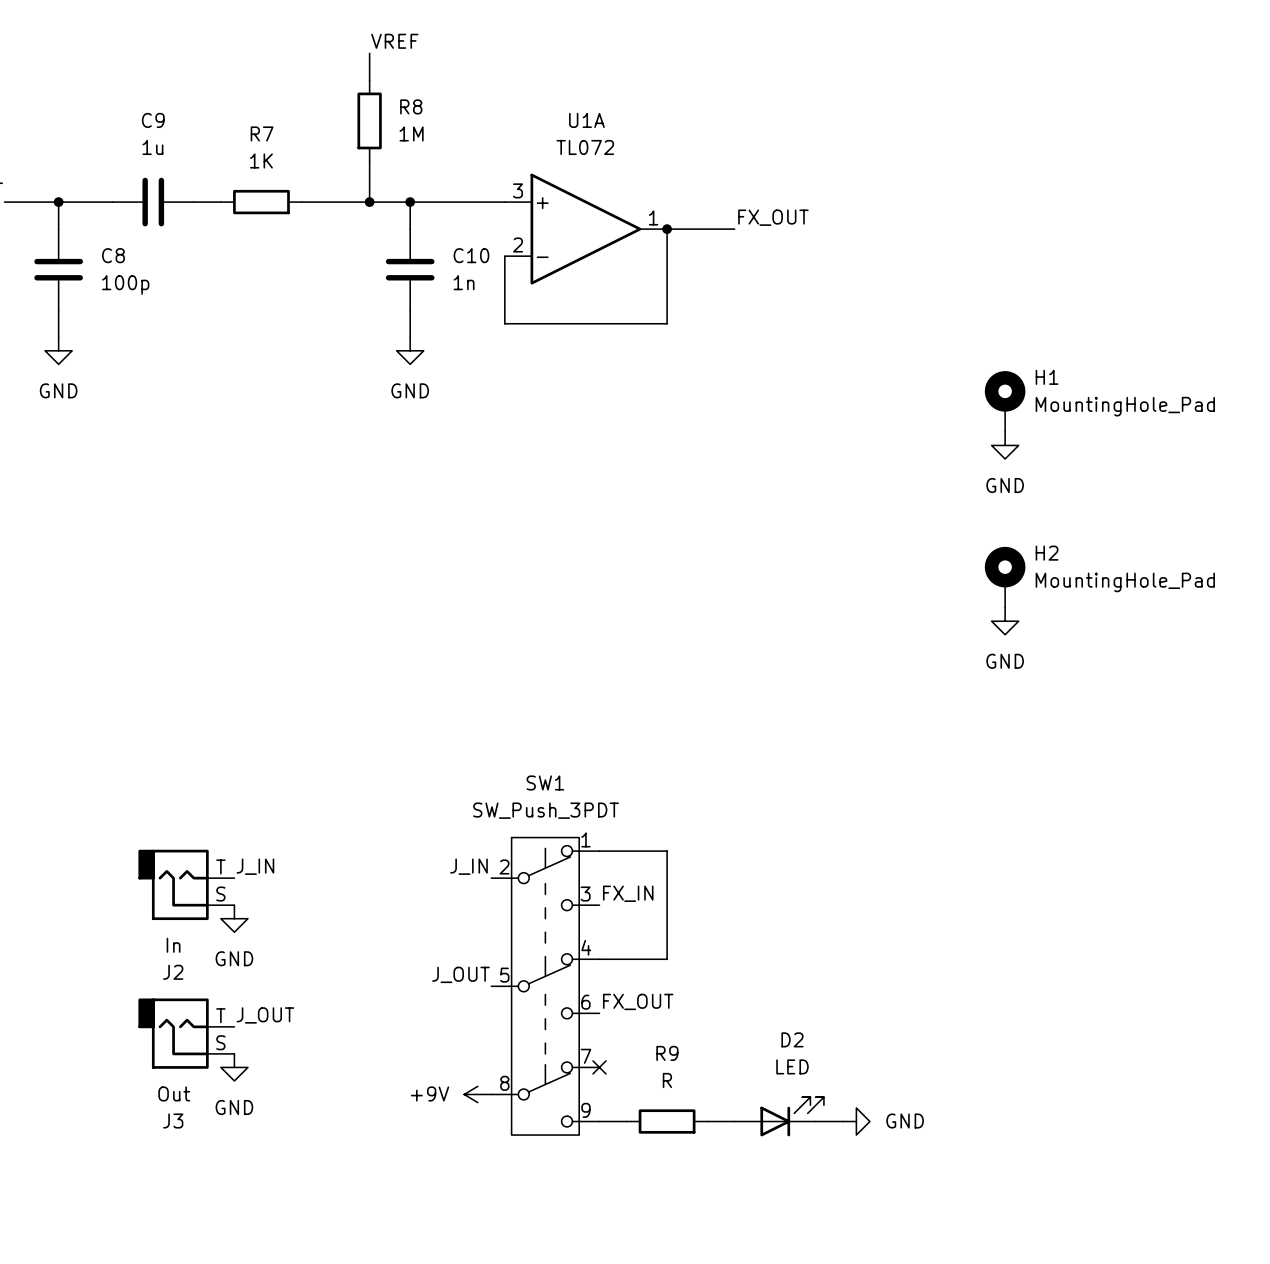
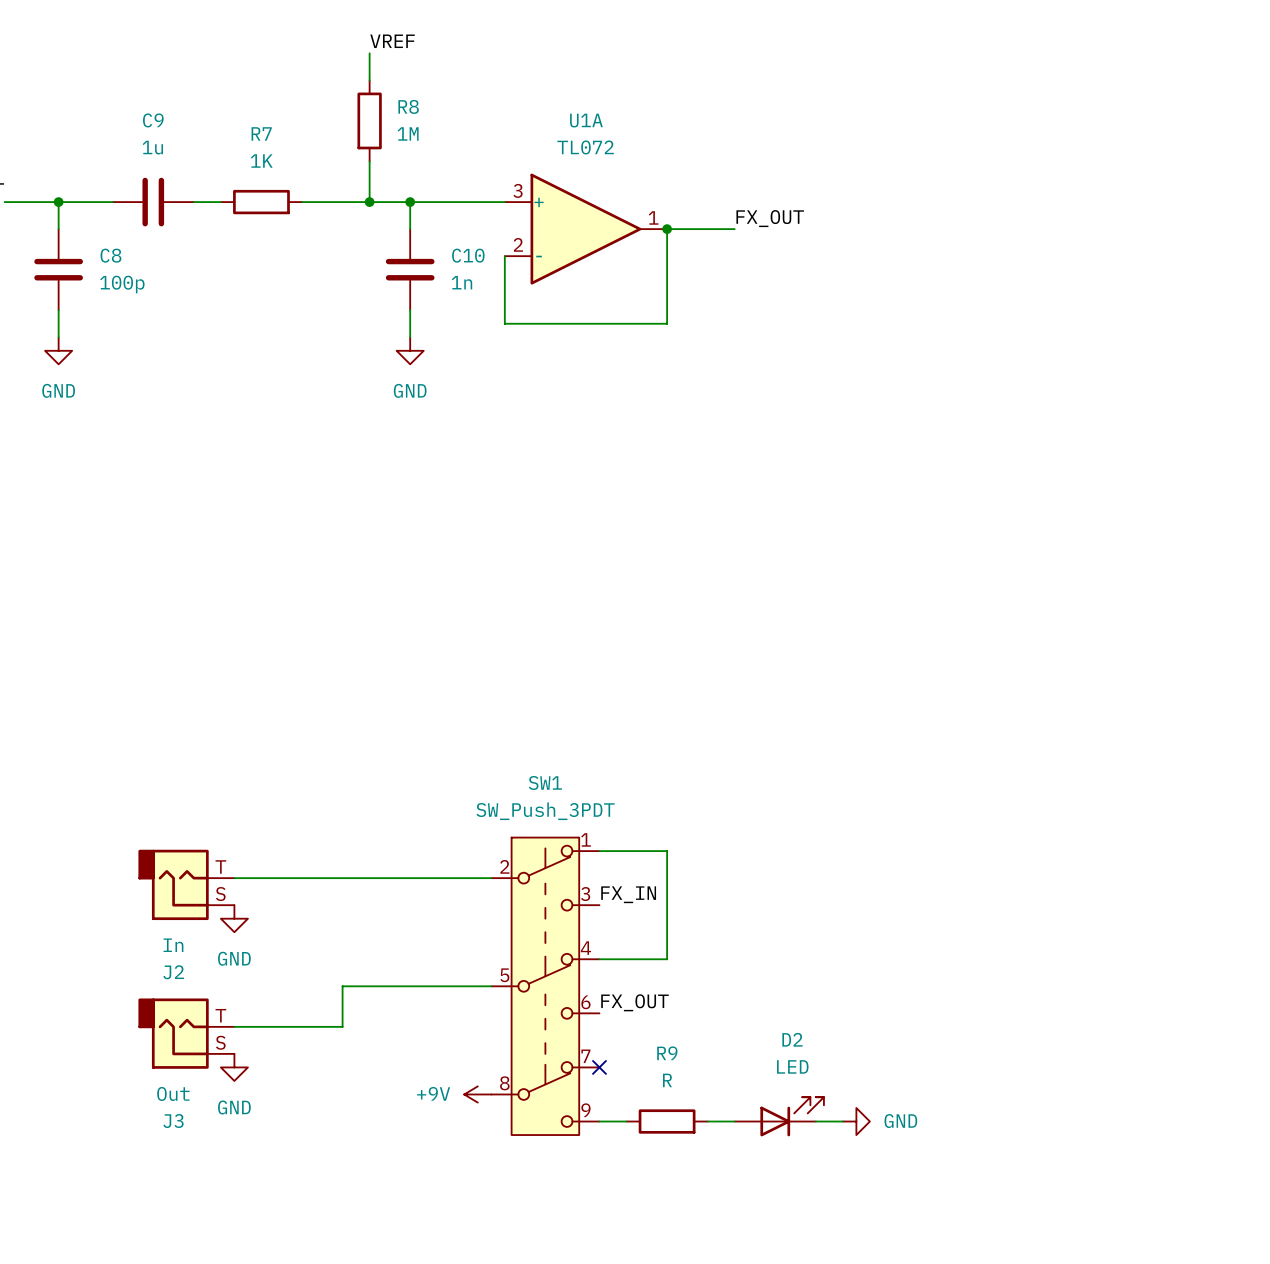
H1: MountingHole_Pad (1005, 401) -> none
power symbol: GND (1005, 445) -> none
H2: MountingHole_Pad (1005, 577) -> none
power symbol: GND (1005, 621) -> none
label: J_IN (255, 866) -> none
label: J_IN (468, 866) -> none
wire: none -> (234, 878) (491, 878)
label: J_OUT (460, 974) -> none
wire: none -> (491, 986) (342, 986) (342, 1026) (234, 1026)
label: J_OUT (265, 1015) -> none

